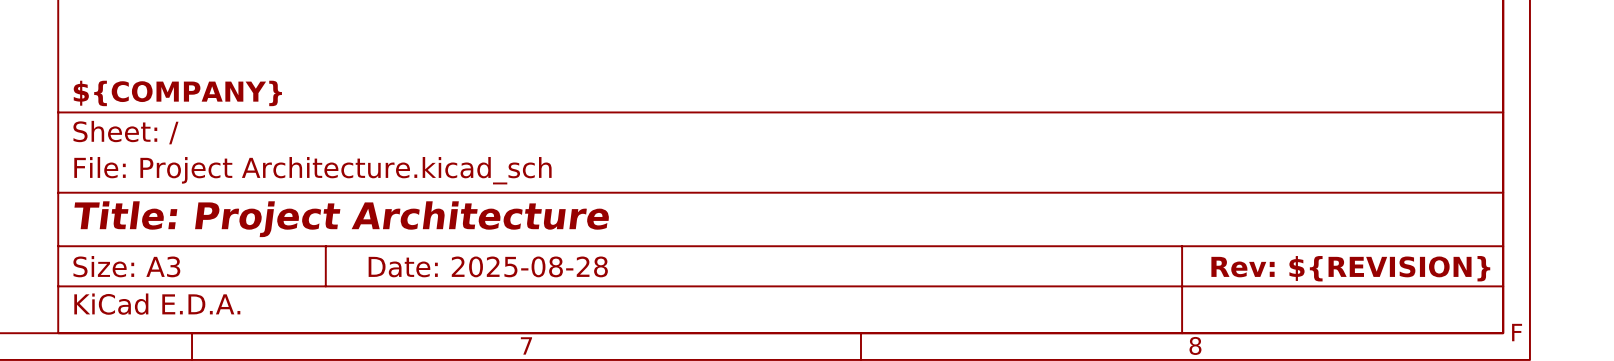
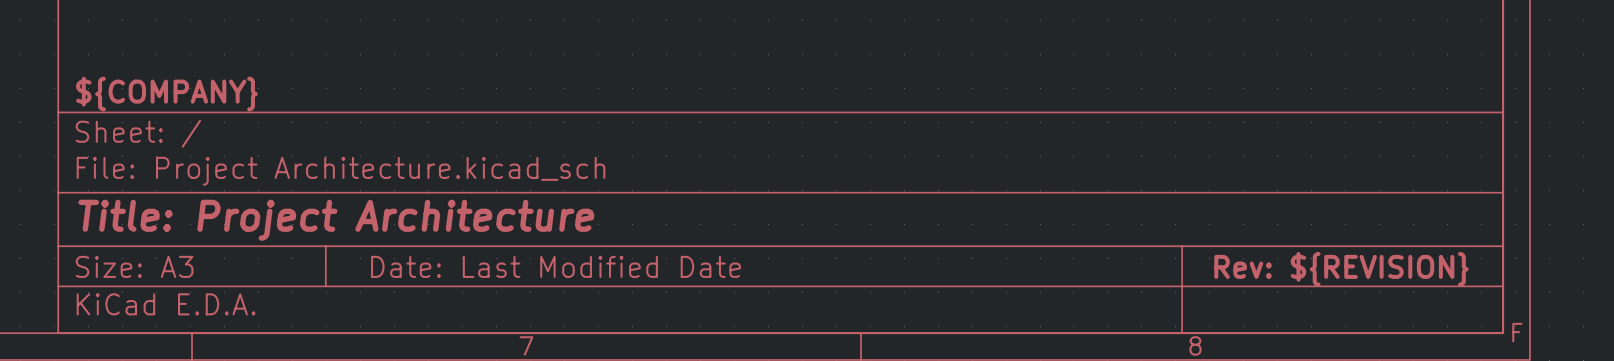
title block: Date: 2025-08-28 (488, 266) -> Date: Last Modified Date (556, 266)

